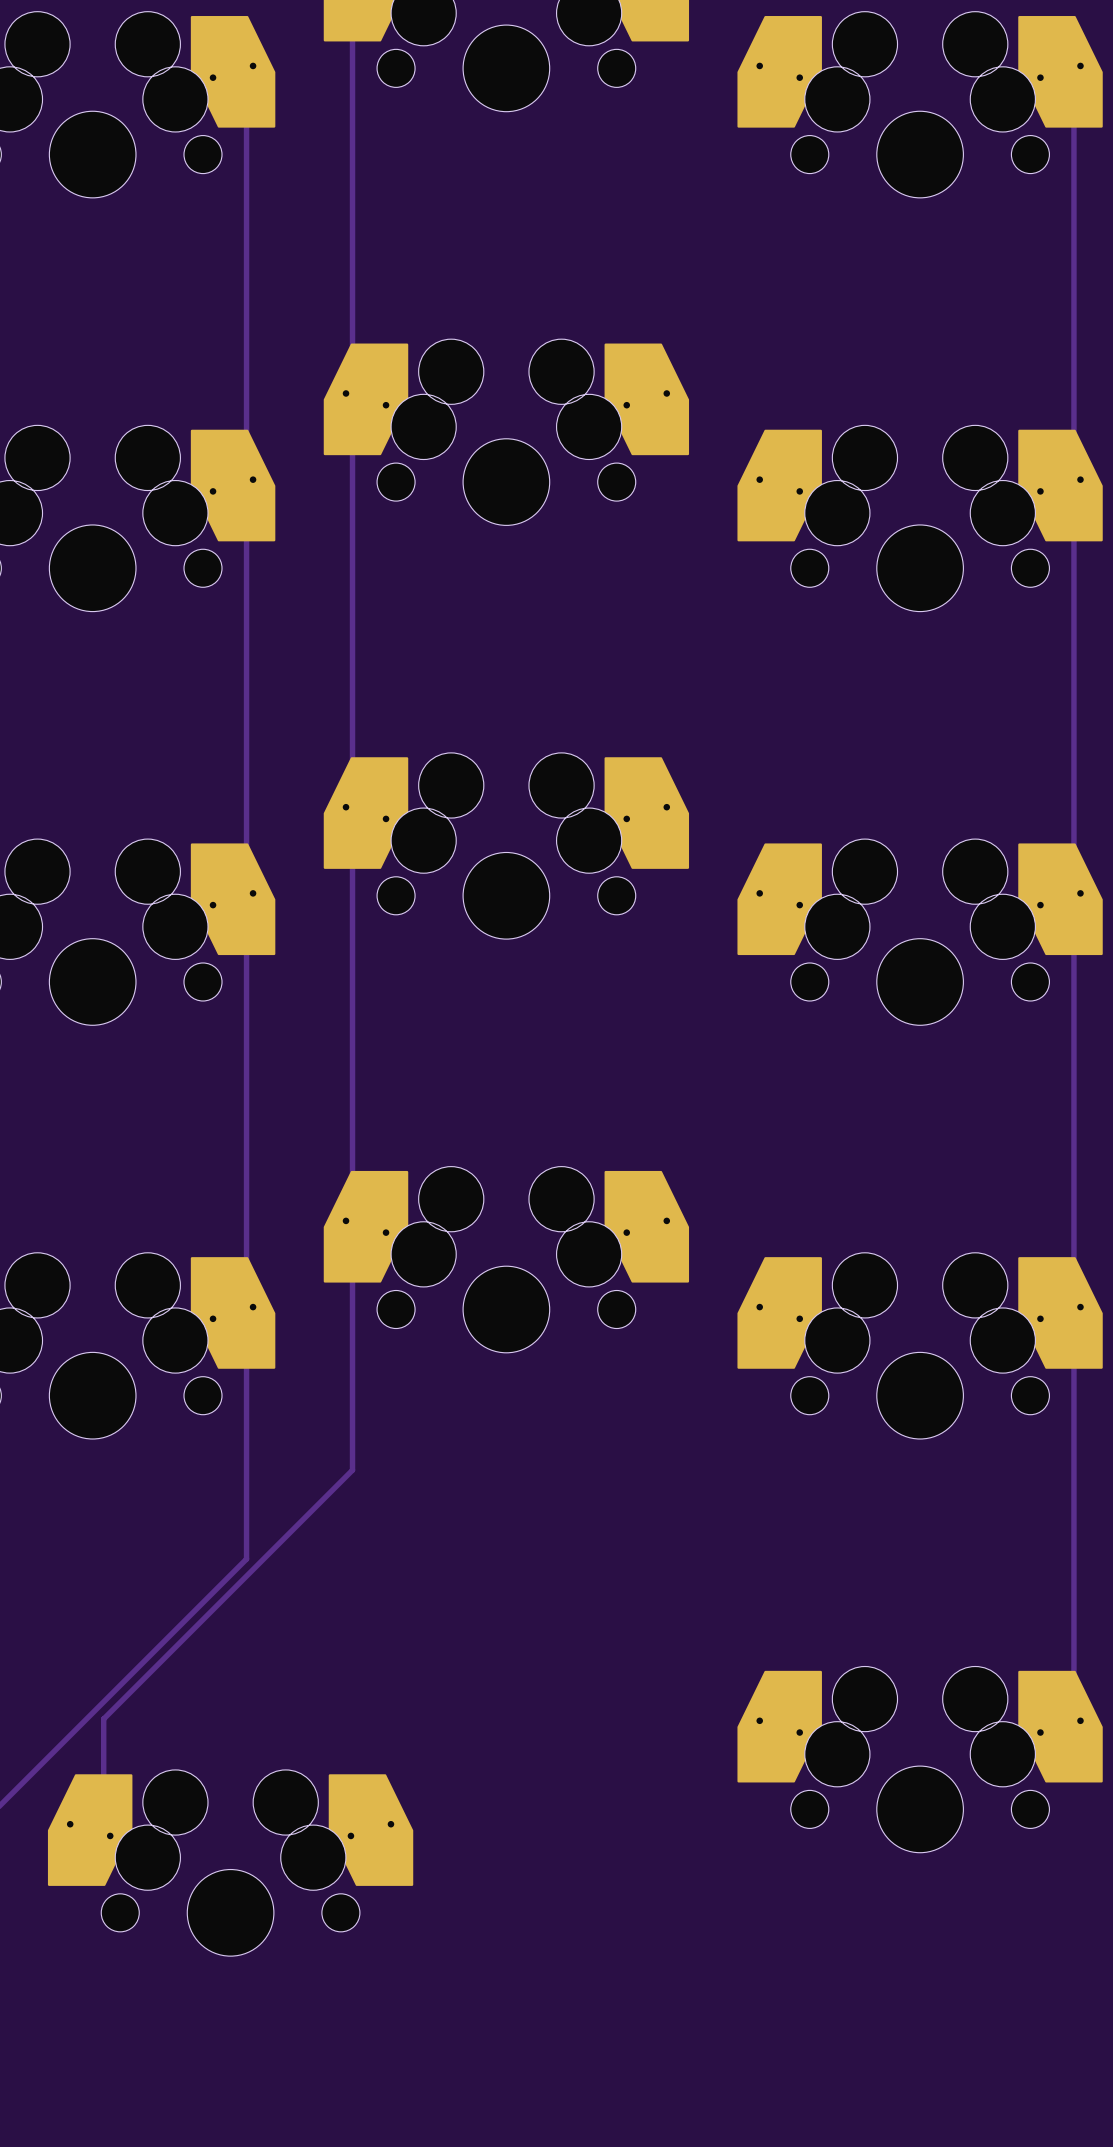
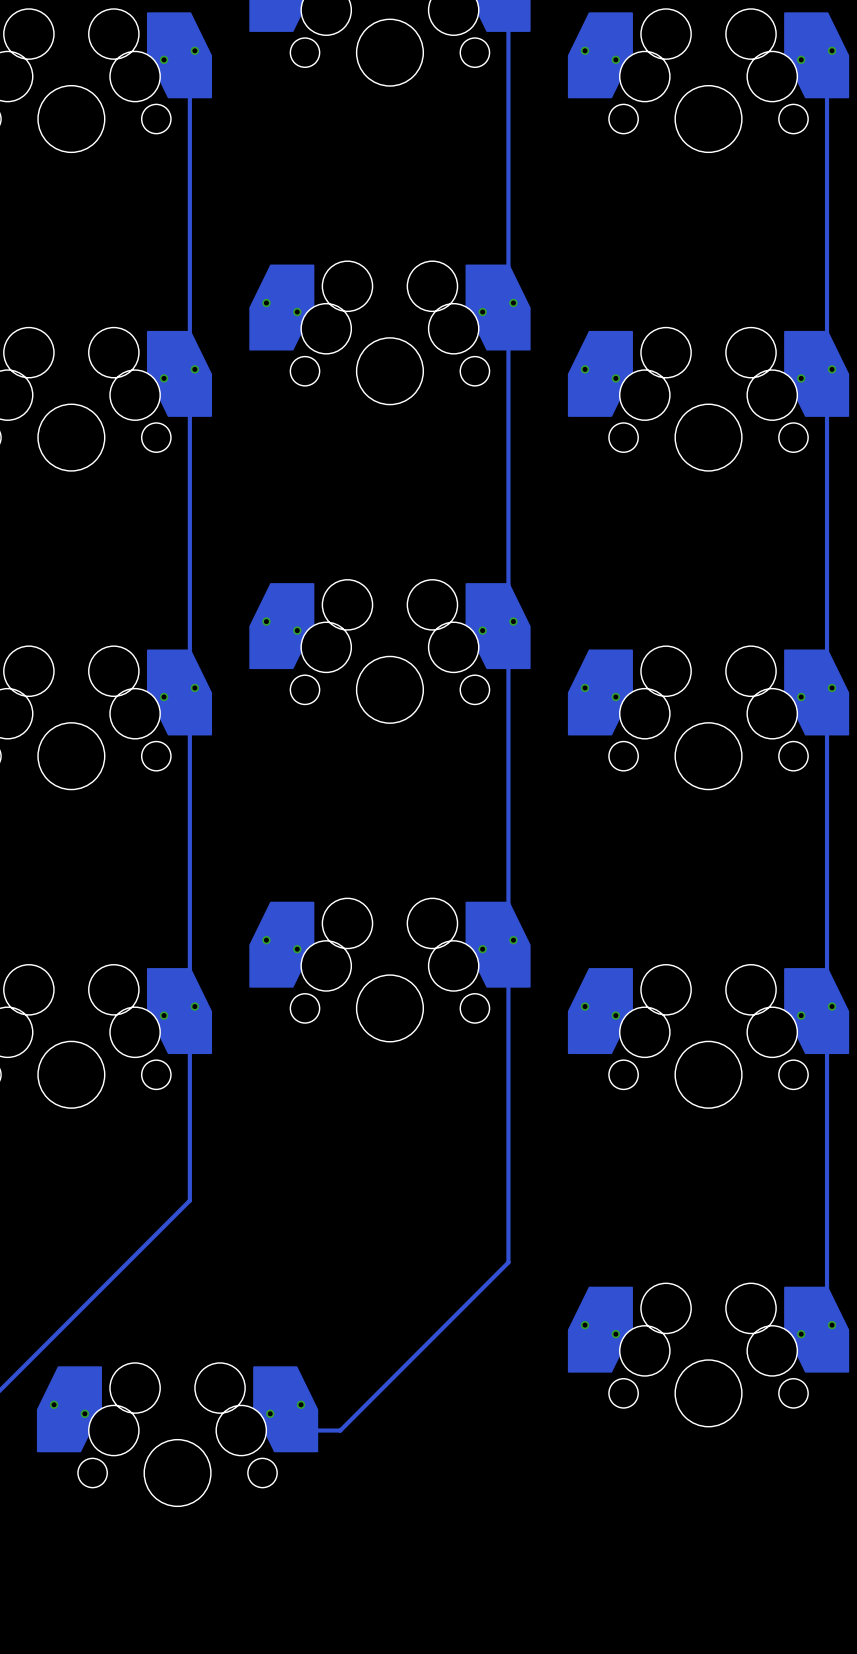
track: (352, 13) (352, 1470) (103, 1718) (103, 1802) -> none
track: none -> (508, 10) (508, 1262) (340, 1430) (296, 1430)

